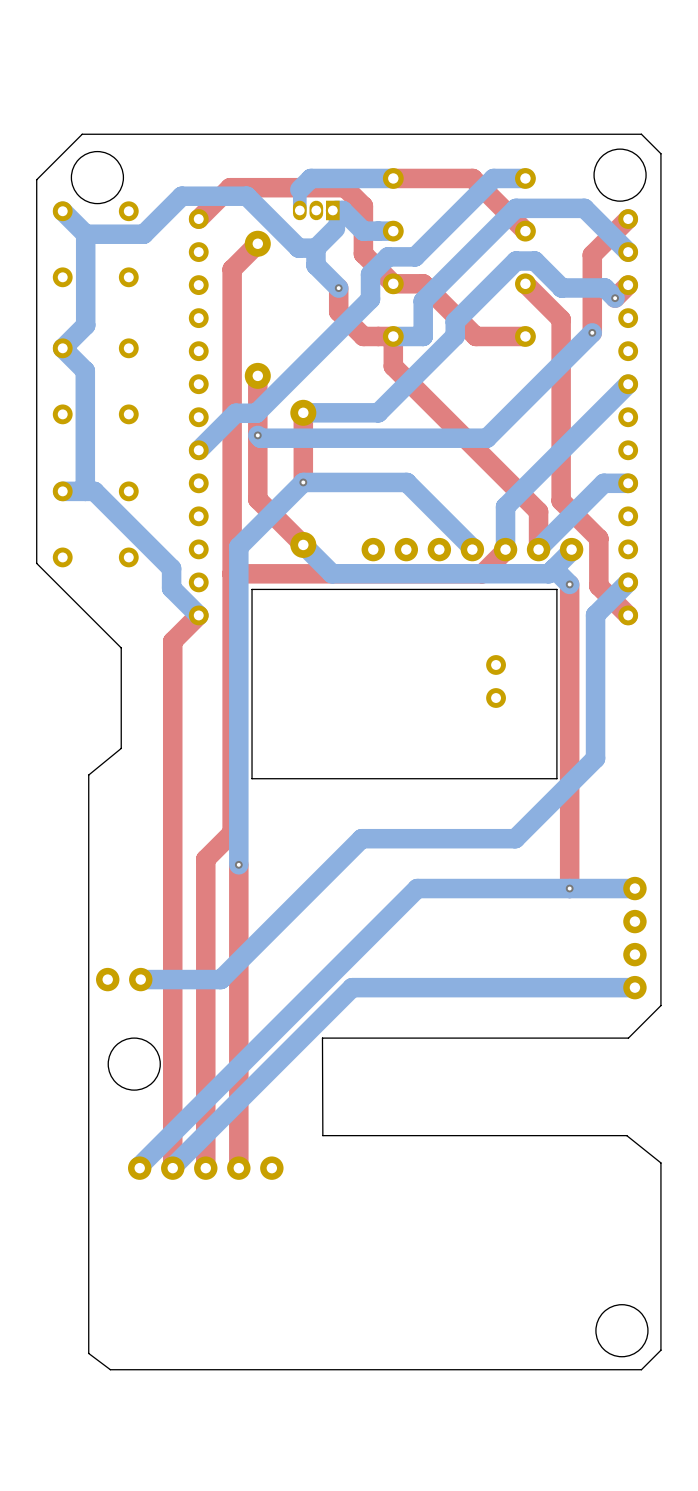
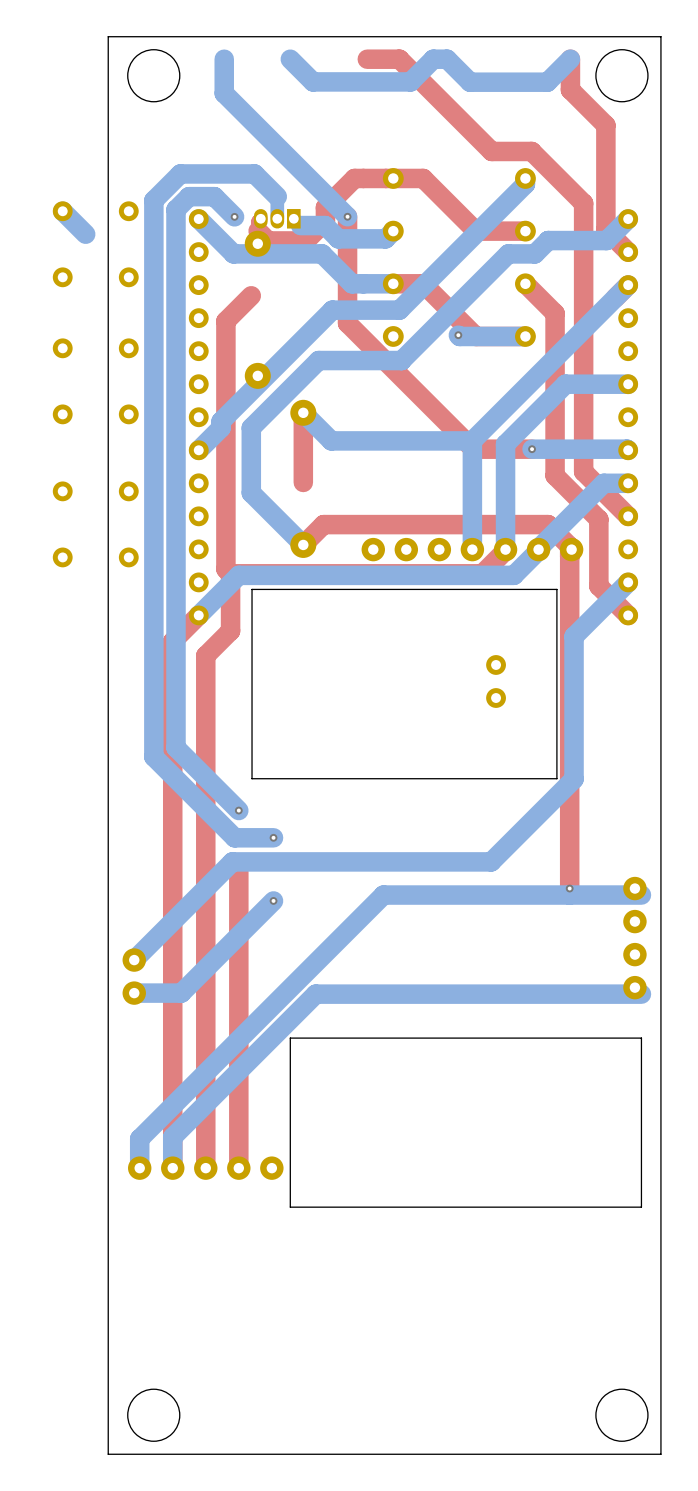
bottom track: none -> (224, 59) (224, 93) (347, 216)
top track: none -> (367, 59) (399, 59) (491, 151) (531, 151) (583, 203) (583, 471) (628, 516)
top track: none -> (570, 59) (570, 89) (605, 125) (605, 229) (628, 252)
bottom track: none -> (570, 59) (547, 82) (470, 82) (447, 59) (433, 59) (410, 81) (313, 81) (290, 59)
board edge: (660, 153) (641, 134) (82, 134) (36, 179) (36, 563) (121, 647) (121, 748) (88, 775) (88, 1353) (110, 1369) (641, 1369) (660, 1350) -> (660, 153) (660, 36) (108, 36) (108, 1454) (660, 1454) (660, 1350)
round board edge position: (620, 175) -> (621, 75)
round board edge position: (97, 177) -> (153, 75)
top track: none -> (393, 178) (354, 178) (325, 207) (325, 221) (305, 240) (268, 240) (258, 231) (258, 221) (260, 218)
bottom track: (393, 178) (310, 178) (299, 189) (299, 210) -> none
top track: (423, 178) (472, 178) (525, 231) -> (423, 178) (475, 231) (525, 231)
bottom track: (525, 178) (493, 178) (415, 256) (388, 256) (370, 274) (370, 299) (256, 413) (235, 413) (221, 427) -> (525, 178) (525, 184) (399, 310) (332, 310) (221, 421) (221, 427)
part position: (316, 210) -> (277, 218)
bottom track: none -> (234, 216) (214, 196) (189, 196) (175, 209) (175, 747) (238, 810)
via: none -> (234, 216)
top track: none -> (347, 216) (347, 323) (473, 449) (532, 449)
via: none -> (347, 216)
bottom track: none -> (277, 218) (277, 196) (254, 173) (180, 173) (153, 200) (153, 756) (234, 837) (273, 837)
top track: (198, 219) (230, 187) (345, 187) (363, 206) (363, 253) (393, 283) -> none
bottom track: none -> (198, 219) (233, 253) (322, 253) (352, 283) (393, 283)
top track: (628, 219) (592, 254) (592, 332) -> none
bottom track: (393, 231) (363, 231) (342, 210) (332, 210) (335, 213) (335, 228) (315, 248) -> (393, 231) (385, 238) (338, 238) (325, 225) (300, 225) (293, 218)
top track: (257, 243) (232, 269) (232, 832) (205, 859) -> (251, 295) (225, 321) (225, 569) (230, 573) (230, 630) (205, 655) (205, 859)
bottom track: (315, 248) (315, 265) (338, 288) -> none
bottom track: (315, 248) (298, 248) (246, 196) (181, 196) (143, 234) (85, 234) (85, 325) (62, 348) (85, 370) (85, 491) -> none
bottom track: (628, 252) (584, 208) (516, 208) (423, 301) (423, 336) (393, 336) -> none
bottom track: none -> (628, 285) (472, 440)
top track: (338, 288) (338, 311) (363, 336) (393, 336) (393, 366) (538, 511) (538, 549) -> none
via: (338, 288) -> none
bottom track: (615, 298) (604, 287) (561, 287) (534, 261) (516, 261) (455, 321) (455, 335) (378, 412) (303, 412) -> (472, 440) (331, 440) (303, 412)
via: (615, 298) -> none
top track: (555, 313) (561, 319) (561, 500) (598, 538) -> (555, 313) (555, 475) (598, 519) (598, 538)
bottom track: (592, 332) (486, 438) (260, 438) (257, 435) -> none
via: (592, 332) -> none
bottom track: none -> (458, 335) (525, 336)
via: none -> (458, 335)
top track: (257, 375) (257, 499) (303, 544) -> (569, 584) (569, 546) (548, 524) (323, 524) (303, 544)
bottom track: (628, 384) (505, 506) -> (628, 384) (565, 384) (505, 444) (505, 506)
via: (257, 435) -> none
bottom track: none -> (532, 449) (628, 450)
via: none -> (532, 449)
via: (303, 482) -> none
bottom track: (62, 491) (94, 491) (171, 568) (171, 588) (198, 615) -> (538, 549) (513, 575) (238, 575) (198, 615)
bottom track: (303, 544) (332, 573) (548, 573) (571, 549) -> (303, 544) (251, 492) (251, 427) (318, 360) (401, 360) (508, 253) (534, 253) (548, 240) (606, 240) (628, 219)
bottom track: (472, 548) (406, 482) (303, 482) (238, 546) (238, 864) -> (472, 548) (472, 440)
bottom track: (553, 568) (569, 584) -> none
via: (569, 584) -> none
bottom track: (595, 615) (595, 758) (515, 838) (361, 838) (220, 979) (140, 979) -> (595, 615) (574, 636) (574, 779) (491, 861) (232, 861) (134, 960)
via: none -> (238, 810)
via: none -> (273, 837)
via: (238, 864) -> none
bottom track: (634, 888) (417, 888) (139, 1166) -> (641, 895) (383, 895) (139, 1138) (139, 1166)
bottom track: none -> (273, 900) (181, 993) (134, 993)
via: none -> (273, 900)
part rotation: 0° (124, 979) -> 90° clockwise (134, 976)
bottom track: (634, 987) (352, 987) (172, 1167) -> (641, 994) (315, 994) (172, 1137) (172, 1167)
board edge: (660, 1005) (628, 1038) -> (660, 1005) (660, 1162)
round board edge: [107, 1037, 161, 1091] -> none
board edge: (322, 1038) (322, 1135) (626, 1135) (660, 1162) -> (322, 1038) (290, 1038) (290, 1207) (641, 1207) (641, 1038) (628, 1038)
round board edge position: (621, 1330) -> (621, 1415)
round board edge: none -> [127, 1388, 181, 1442]

